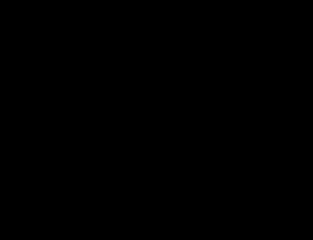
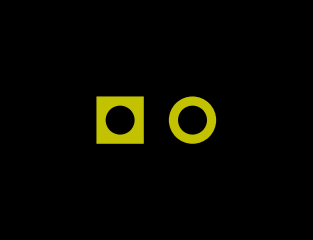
part: none -> (156, 120)

